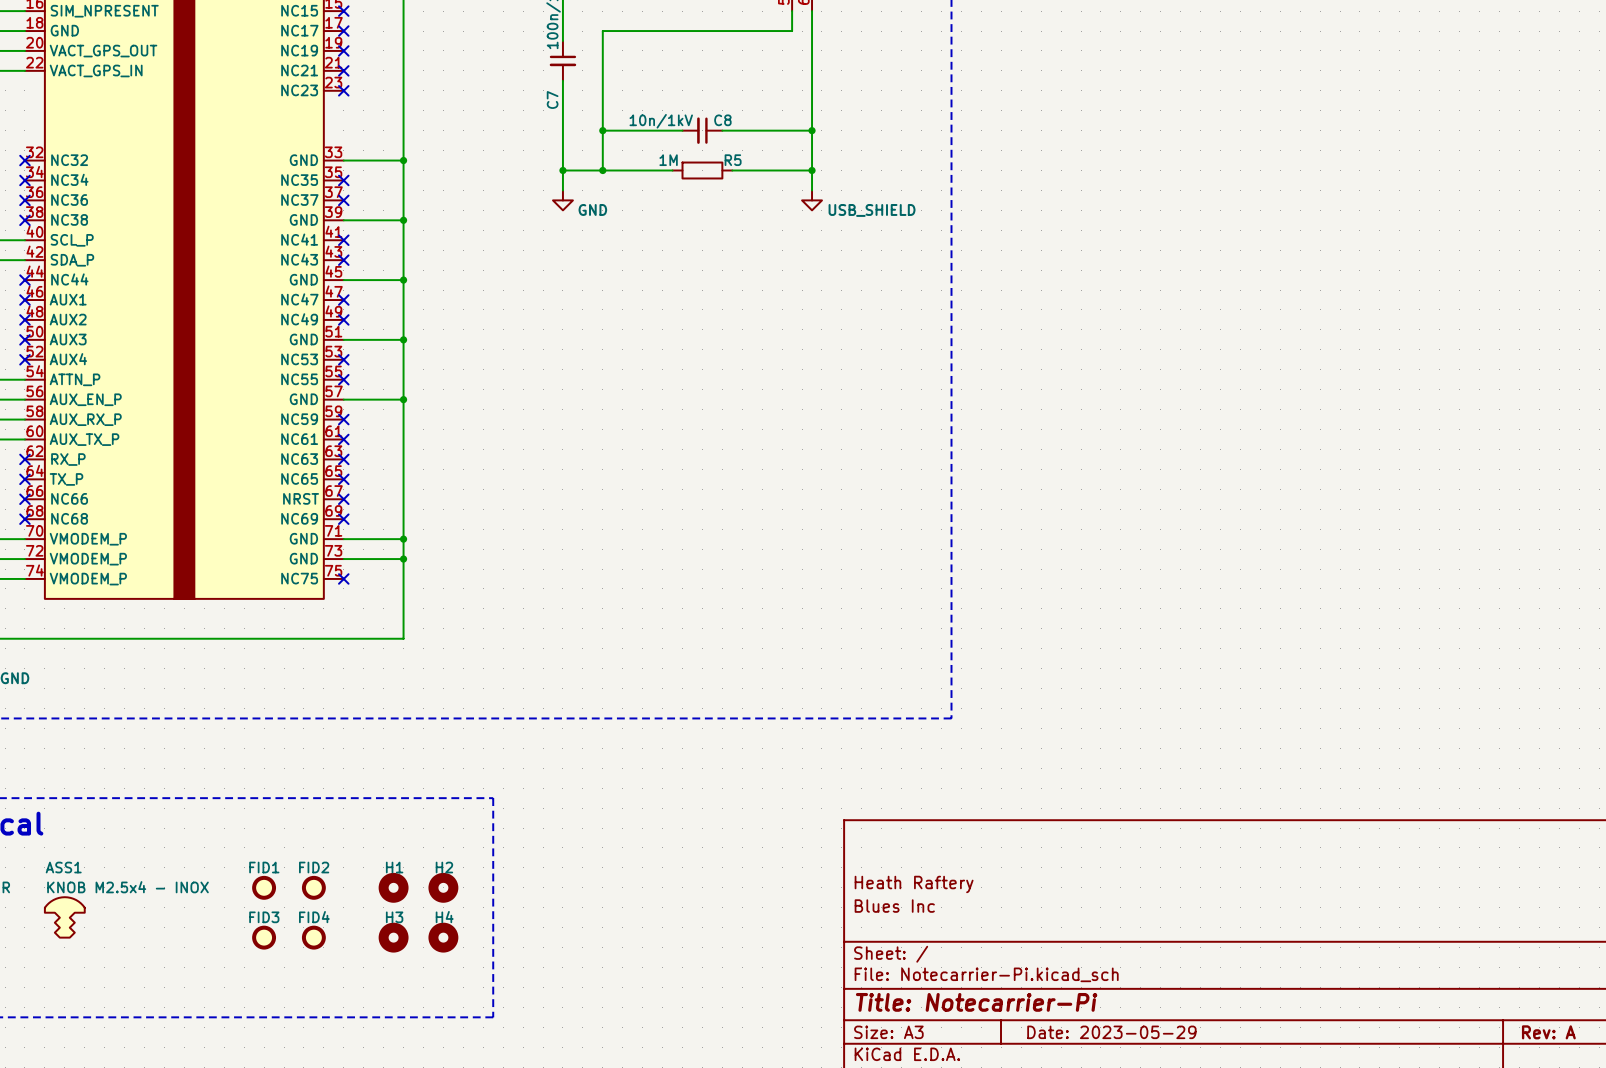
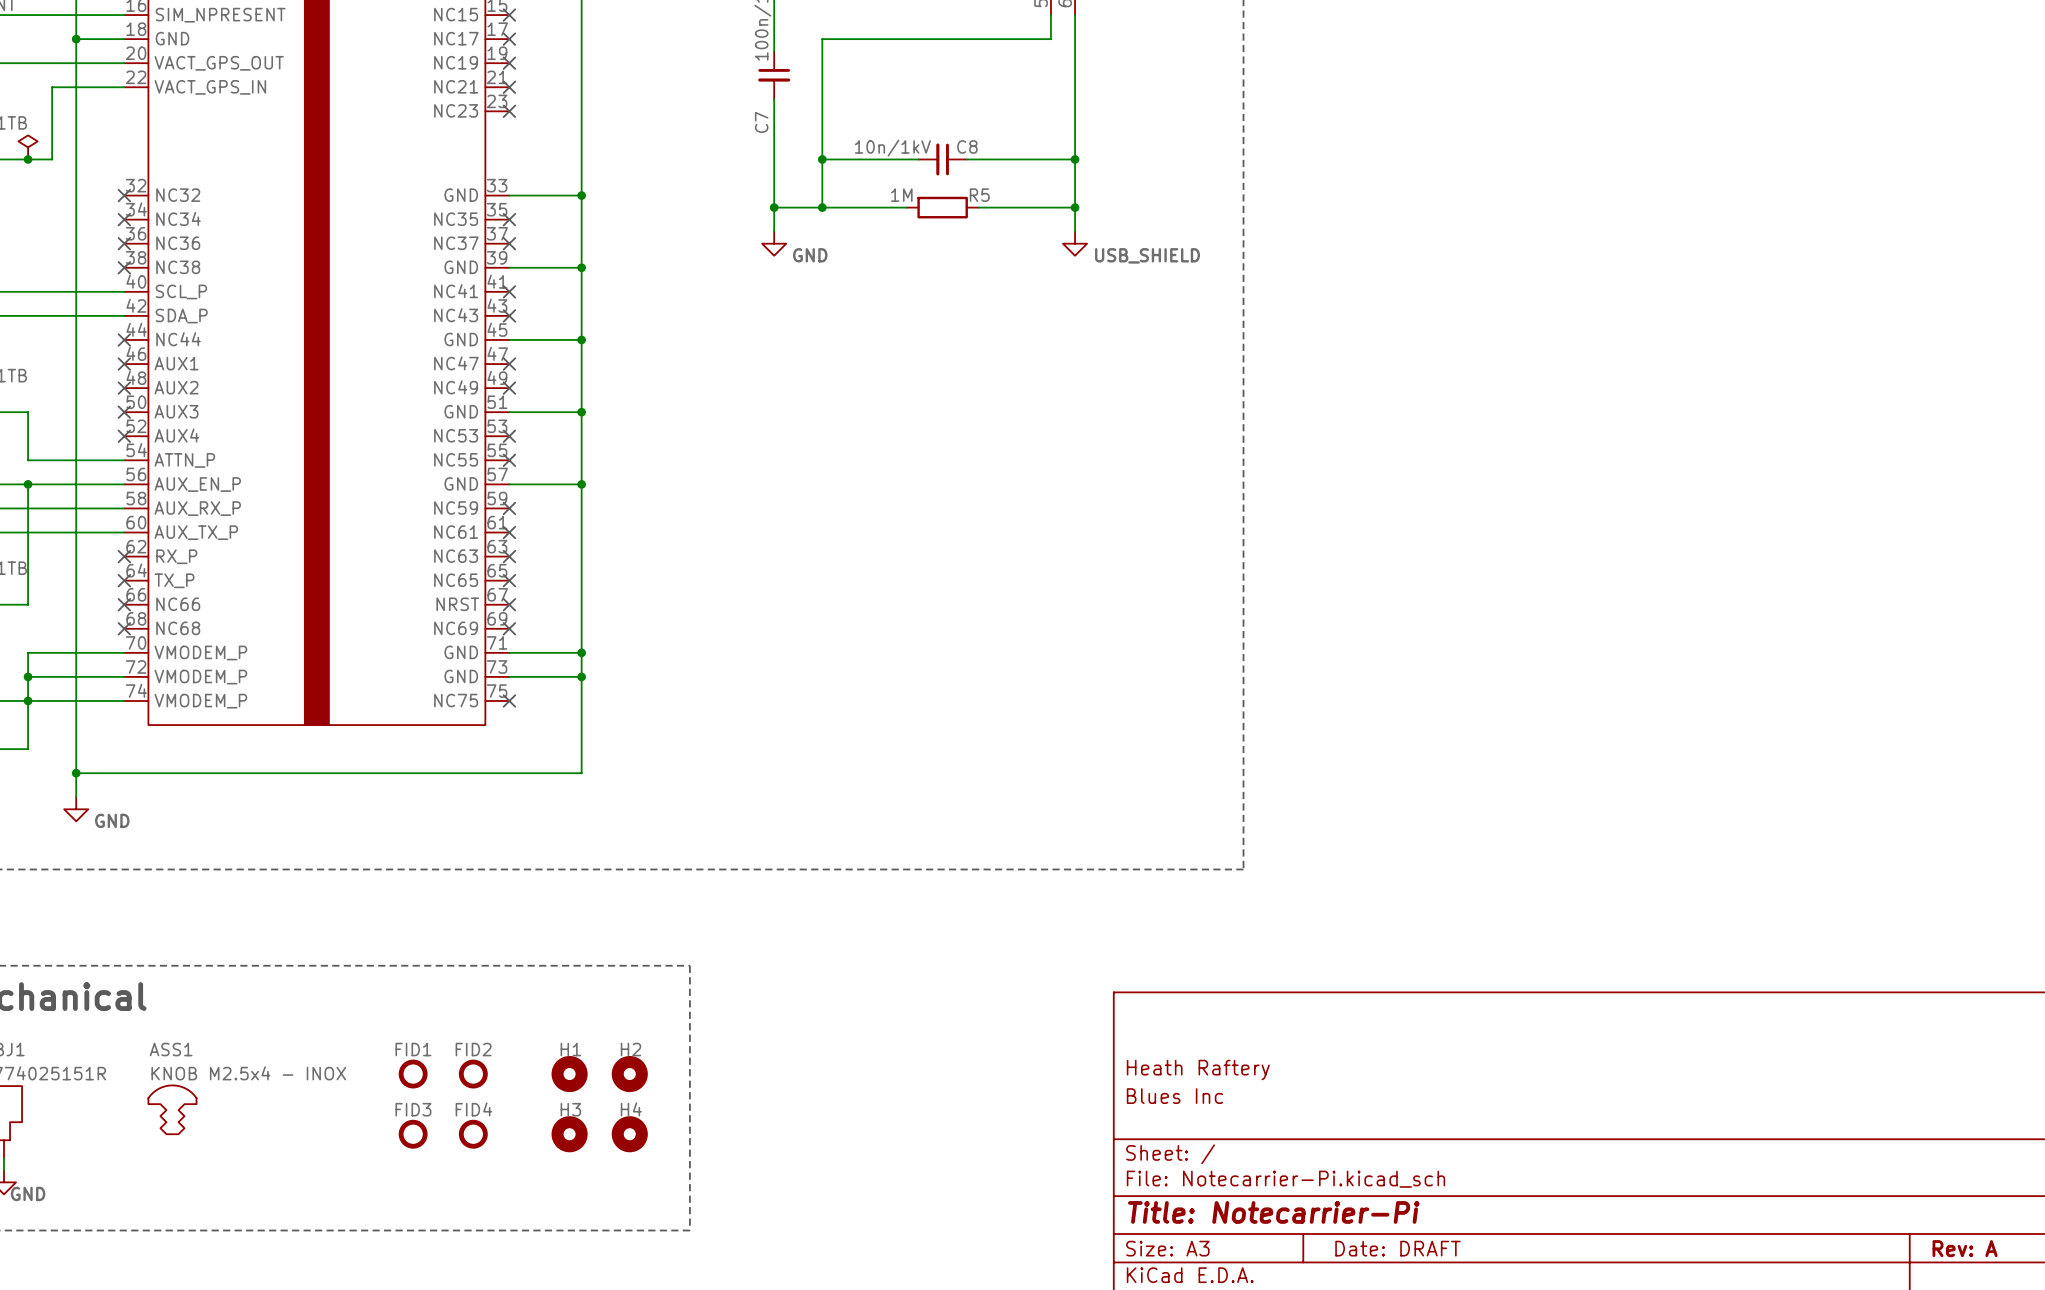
title block: Date: 2023-05-29 (1111, 1032) -> Date: DRAFT (1397, 1248)

